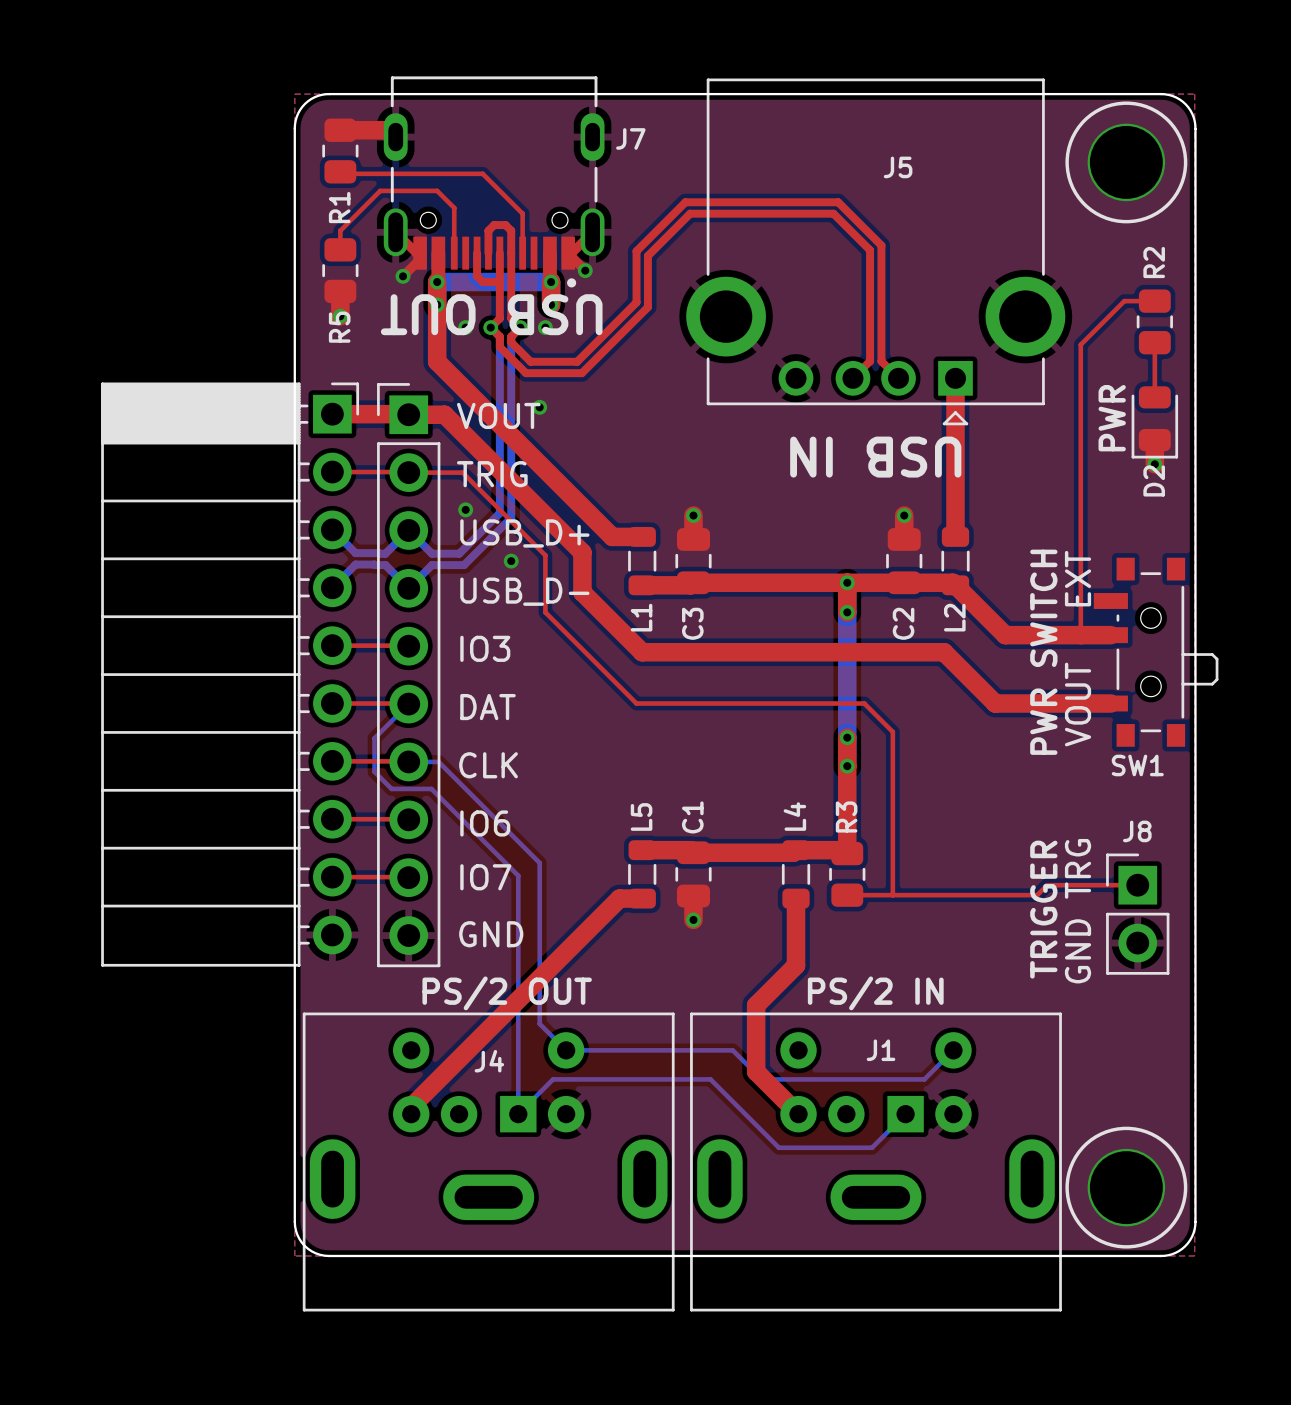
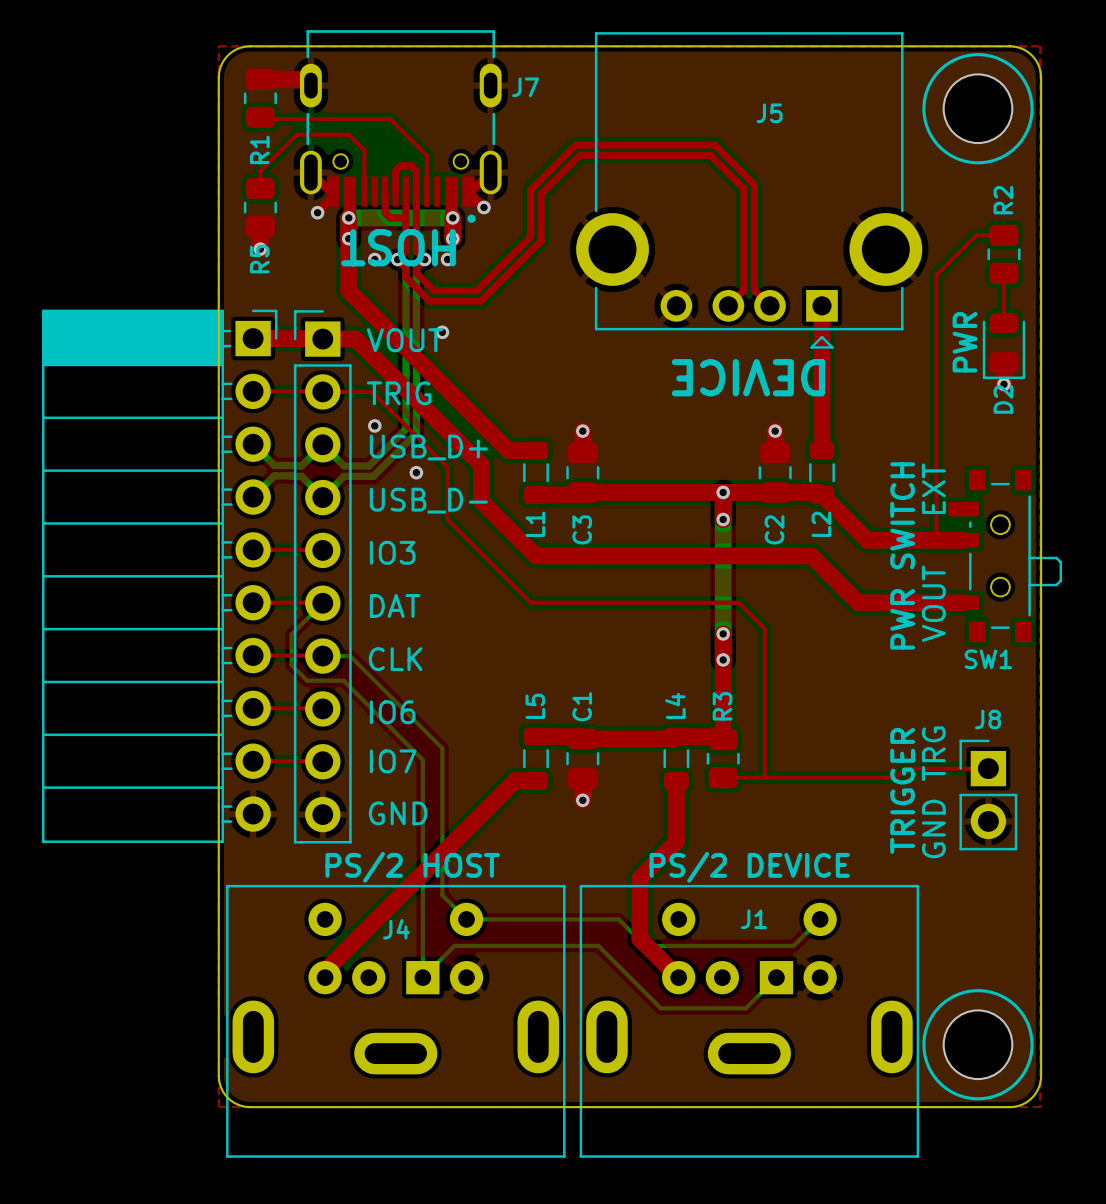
text: USB OUT (491, 314) -> HOST (398, 247)
text: USB IN (875, 457) -> DEVICE (748, 377)
text: PS/2 OUT (507, 993) -> PS/2 HOST (412, 867)
text: PS/2 IN (875, 993) -> PS/2 DEVICE (749, 867)

